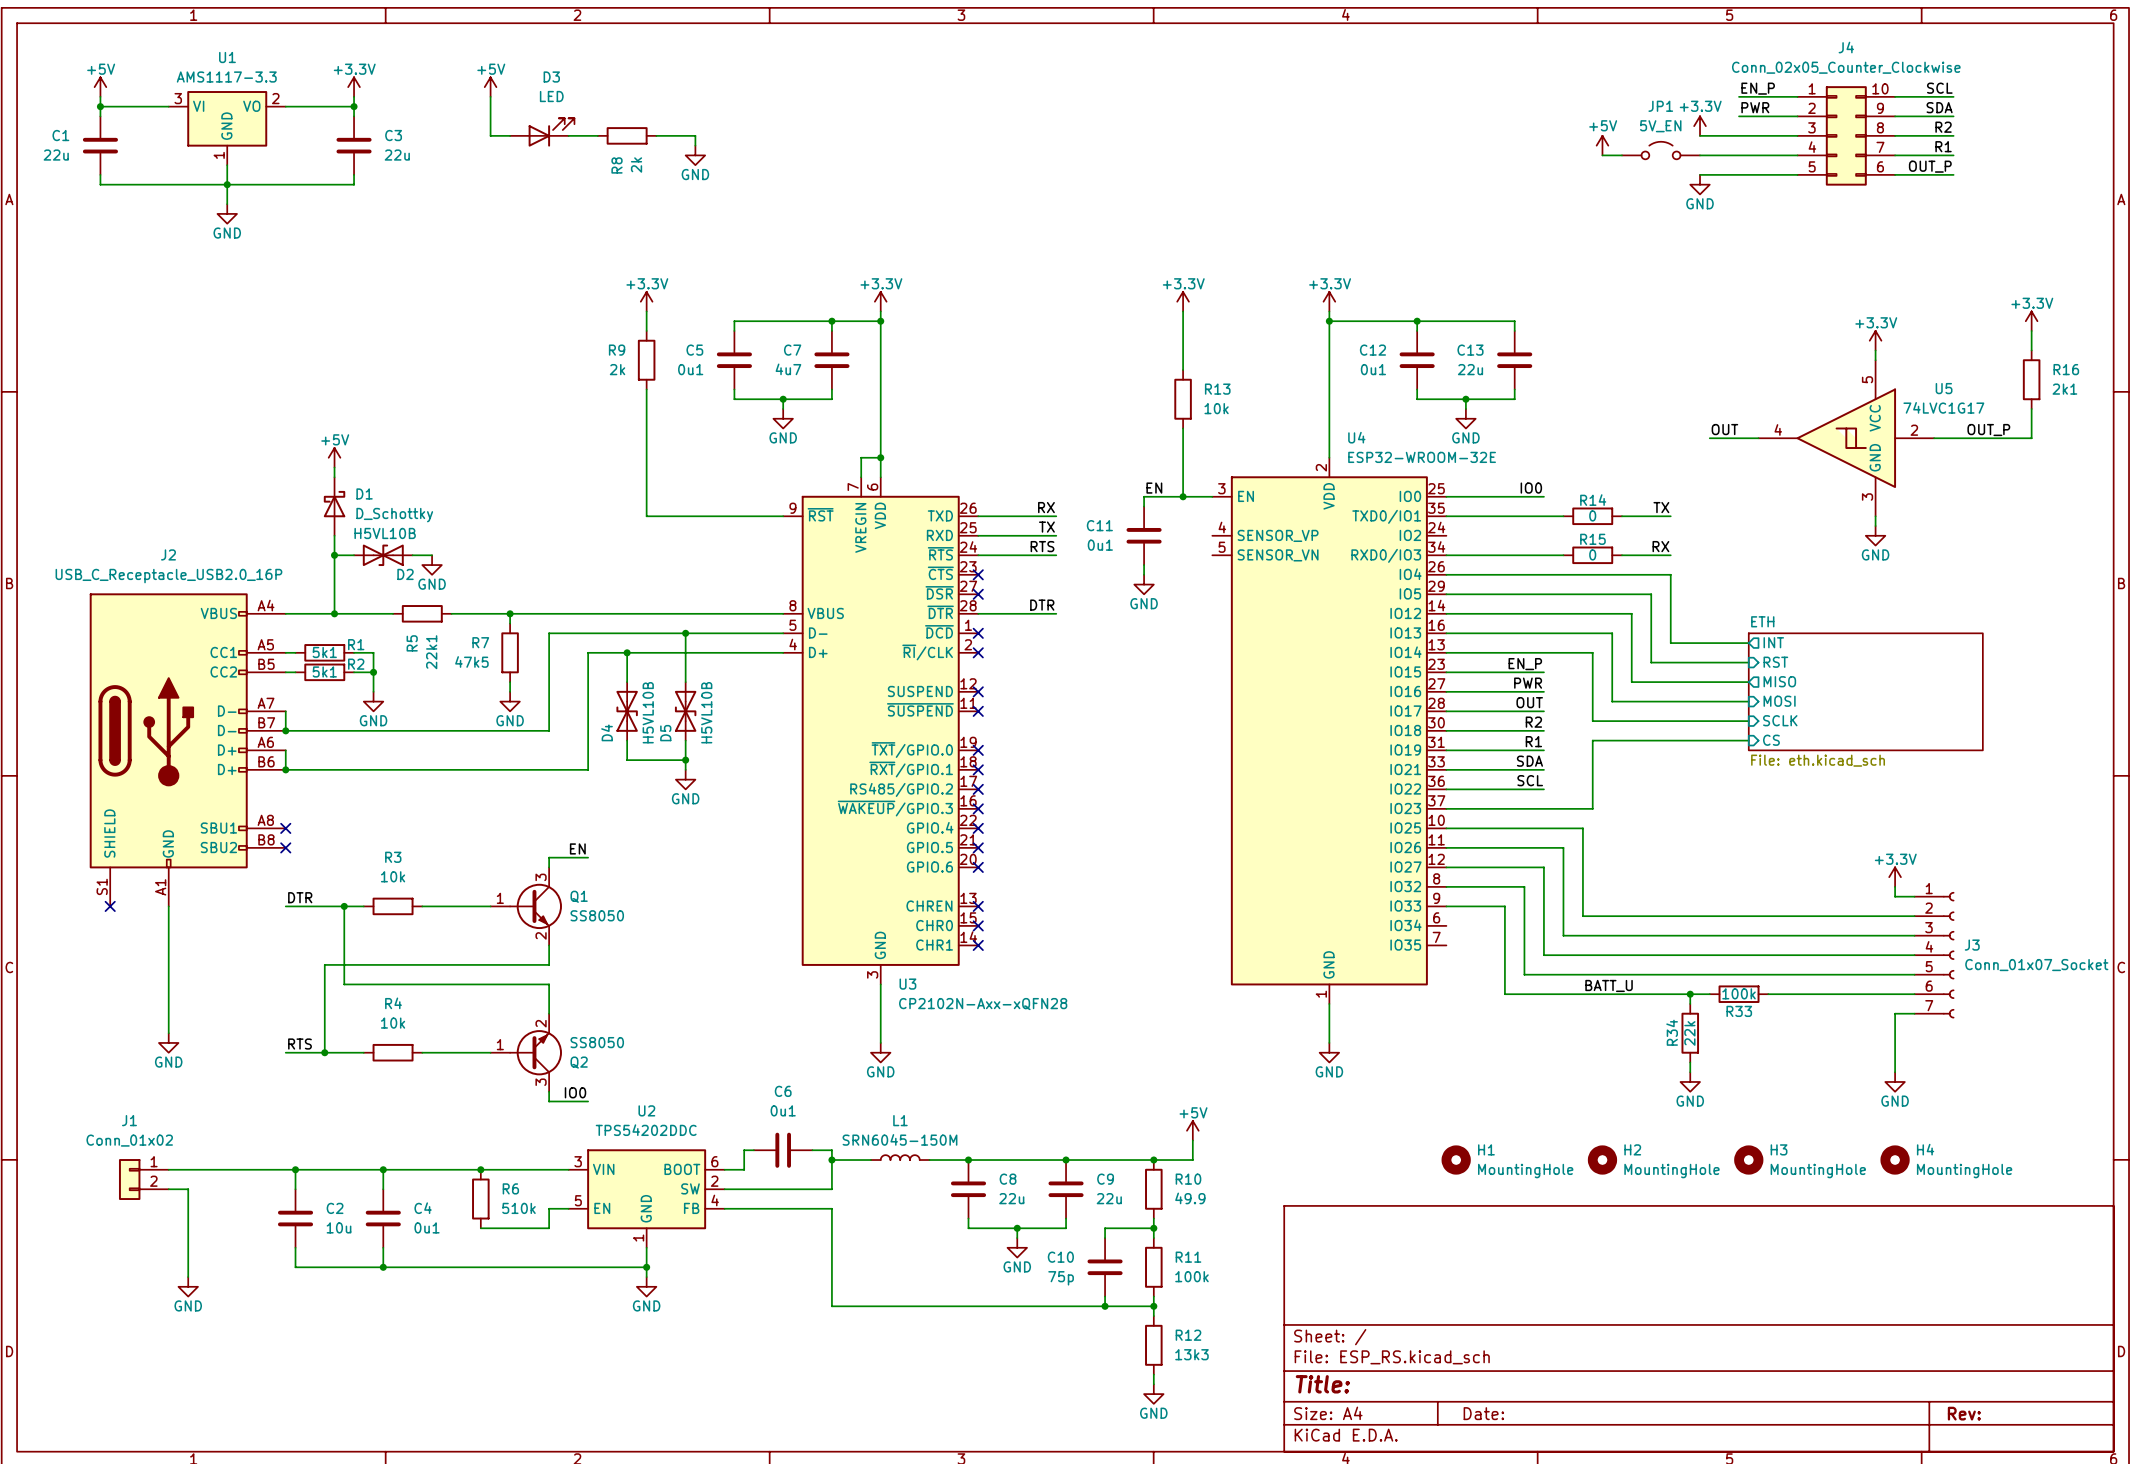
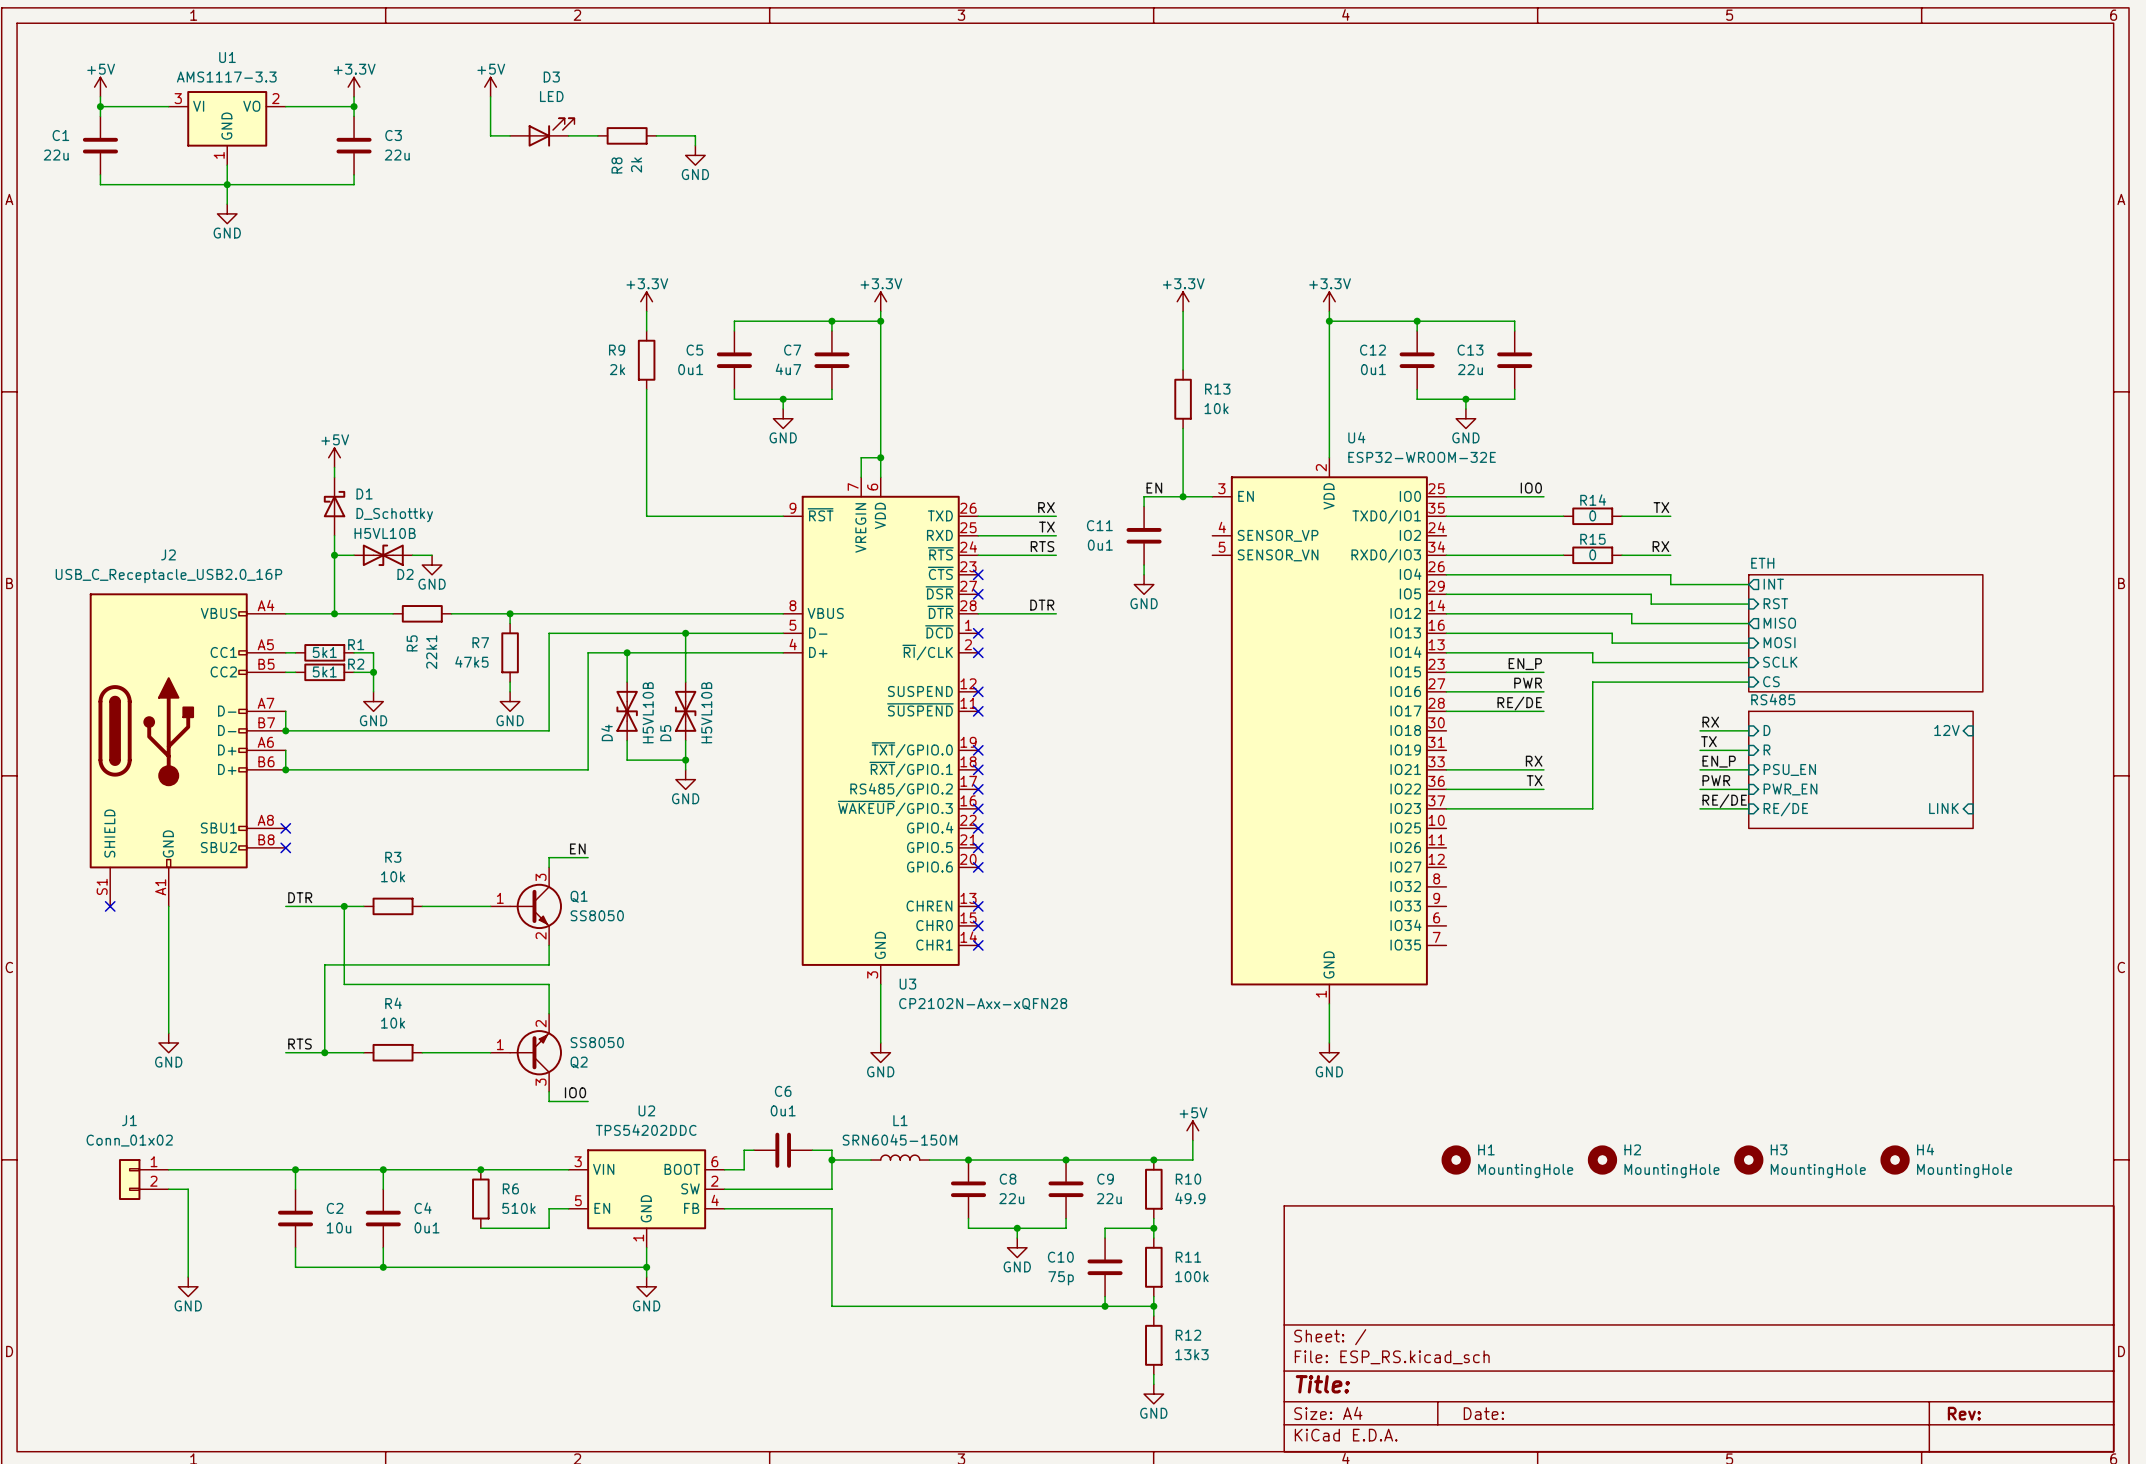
label: EN_P (1758, 88) -> none
label: SCL (1939, 88) -> none
wire: (1739, 96) (1797, 96) -> none
wire: (1895, 96) (1953, 96) -> none
label: PWR (1755, 107) -> none
label: SDA (1939, 107) -> none
wire: (1739, 116) (1797, 116) -> none
wire: (1895, 116) (1953, 116) -> none
power symbol: +3.3V (1700, 126) -> none
label: R2 (1943, 127) -> none
wire: (1700, 135) (1797, 135) -> none
J4: Conn_02x05_Counter_Clockwise (1846, 135) -> none
wire: (1895, 135) (1953, 135) -> none
power symbol: +5V (1602, 145) -> none
label: R1 (1943, 146) -> none
JP1: 5V_EN (1660, 150) -> none
wire: (1602, 155) (1621, 155) -> none
wire: (1700, 155) (1797, 155) -> none
wire: (1895, 155) (1953, 155) -> none
label: OUT_P (1930, 166) -> none
wire: (1700, 174) (1797, 174) -> none
wire: (1895, 174) (1953, 174) -> none
power symbol: GND (1700, 184) -> none
power symbol: +3.3V (2031, 321) -> none
wire: (2031, 330) (2031, 350) -> none
power symbol: +3.3V (1875, 340) -> none
wire: (1875, 350) (1875, 360) -> none
R16: 2k1 (2031, 379) -> none
wire: (2031, 408) (2031, 438) (1934, 438) -> none
label: OUT (1724, 429) -> none
label: OUT_P (1988, 430) -> none
wire: (1709, 438) (1758, 438) -> none
U5: 74LVC1G17 (1846, 438) -> none
wire: (1875, 516) (1875, 526) -> none
power symbol: GND (1875, 535) -> none
wire: (1670, 584) (1670, 643) -> (1612, 643) (1670, 643)
wire: none -> (1670, 584) (1748, 584)
sheet pin: none -> INT (1773, 584)
sheet pin: none -> RST (1775, 603)
wire: (1651, 604) (1651, 662) -> (1592, 662) (1651, 662)
wire: none -> (1651, 604) (1748, 604)
wire: (1631, 623) (1631, 682) -> (1631, 623) (1748, 623)
sheet pin: none -> MISO (1779, 623)
sheet ETH: none -> (1865, 633)
sheet pin shape: output (1773, 642) -> input (1779, 642)
sheet pin: INT (1773, 642) -> MOSI (1779, 642)
wire: (1612, 643) (1612, 701) (1748, 701) -> none
wire: (1592, 662) (1592, 682) -> (1631, 682) (1592, 682)
sheet pin: RST (1775, 662) -> SCLK (1780, 662)
sheet pin shape: output (1779, 681) -> input (1771, 681)
sheet pin: MISO (1779, 681) -> CS (1771, 681)
sheet ETH: File: eth.kicad_sch (1865, 691) -> none
sheet pin: MOSI (1779, 701) -> none
label: OUT (1529, 702) -> RE/DE (1519, 703)
sheet pin: SCLK (1780, 720) -> none
wire: (1592, 721) (1748, 721) -> (1592, 721) (1592, 740)
label: R2 (1533, 722) -> none
label: none -> RX (1710, 722)
wire: (1446, 730) (1543, 730) -> none
wire: none -> (1700, 730) (1748, 730)
sheet pin: none -> D (1767, 730)
sheet pin: none -> 12V (1946, 730)
wire: (1592, 740) (1748, 740) -> none
sheet pin: CS (1771, 740) -> none
label: R1 (1533, 741) -> none
label: none -> TX (1708, 741)
wire: (1446, 750) (1543, 750) -> none
wire: none -> (1700, 750) (1748, 750)
sheet pin: none -> R (1767, 750)
label: SDA (1529, 761) -> RX (1534, 761)
label: none -> EN_P (1719, 761)
wire: none -> (1700, 769) (1748, 769)
sheet pin: none -> PSU_EN (1789, 769)
sheet RS485: none -> (1860, 769)
label: SCL (1530, 780) -> TX (1534, 780)
label: none -> PWR (1716, 780)
wire: none -> (1700, 789) (1748, 789)
sheet pin: none -> PWR_EN (1790, 789)
label: none -> RE/DE (1724, 801)
wire: none -> (1700, 808) (1748, 808)
sheet pin: none -> LINK (1943, 808)
sheet pin: none -> RE/DE (1785, 809)
wire: (1446, 828) (1582, 828) (1582, 916) (1914, 916) -> none
wire: (1446, 847) (1563, 847) (1563, 935) (1914, 935) -> none
wire: (1446, 867) (1543, 867) (1543, 955) (1914, 955) -> none
power symbol: +3.3V (1895, 877) -> none
wire: (1446, 886) (1524, 886) (1524, 974) (1914, 974) -> none
wire: (1895, 886) (1895, 896) (1914, 896) -> none
wire: (1446, 906) (1504, 906) (1504, 994) (1709, 994) -> none
J3: Conn_01x07_Socket (1934, 955) -> none
label: BATT_U (1609, 985) -> none
wire: (1690, 994) (1690, 1003) -> none
junction: (1690, 994) -> none
R33: 100k (1739, 994) -> none
wire: (1768, 994) (1914, 994) -> none
wire: (1914, 1013) (1895, 1013) (1895, 1072) -> none
R34: 22k (1690, 1033) -> none
wire: (1690, 1062) (1690, 1072) -> none
power symbol: GND (1690, 1081) -> none
power symbol: GND (1895, 1081) -> none

